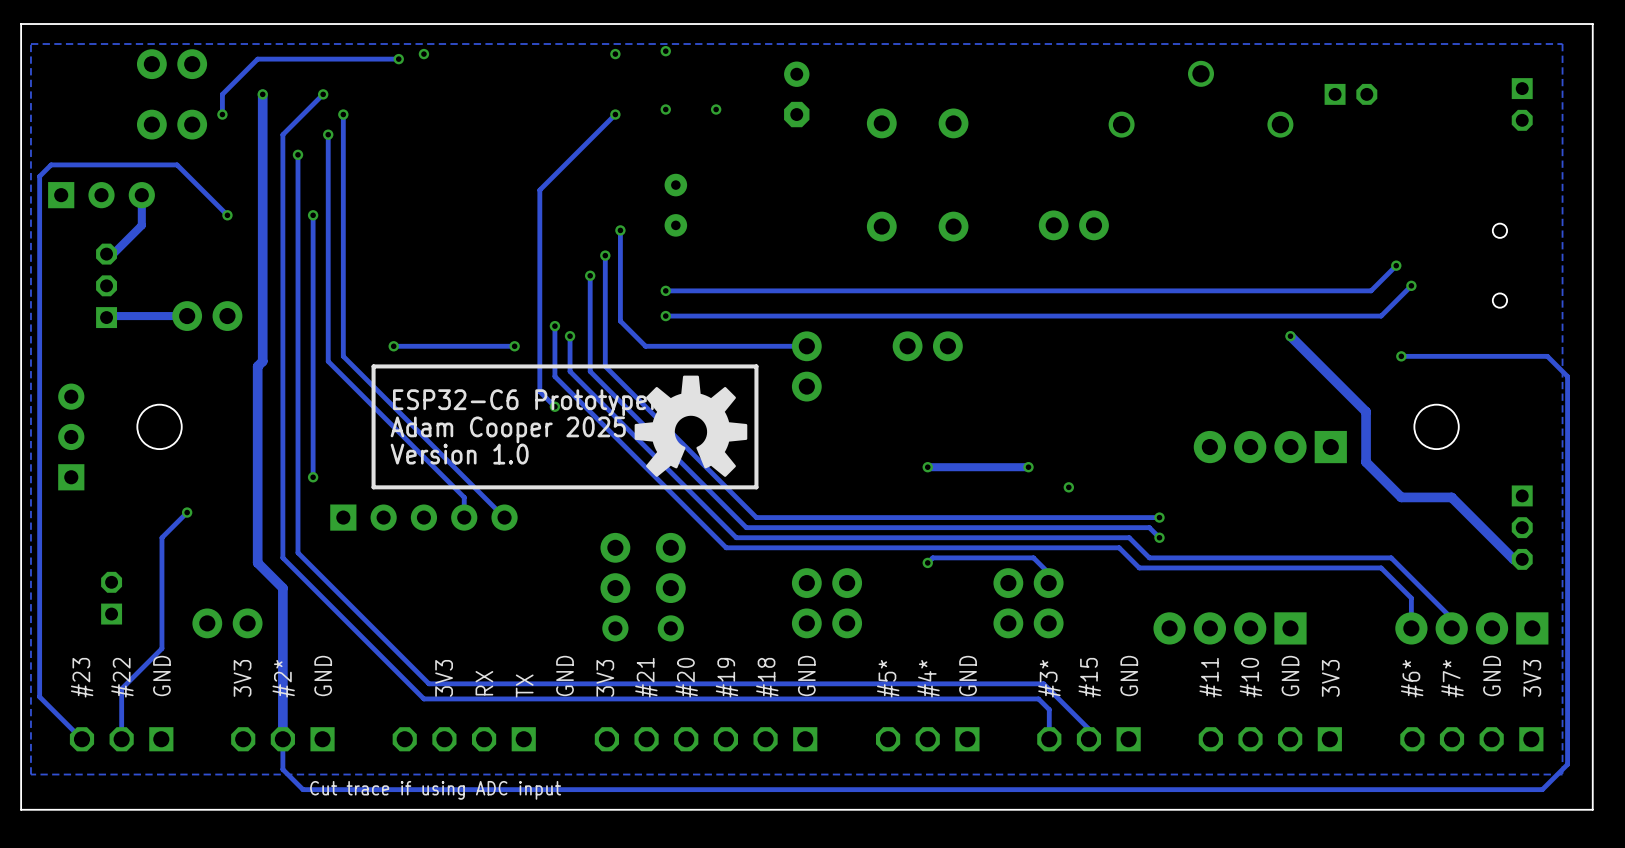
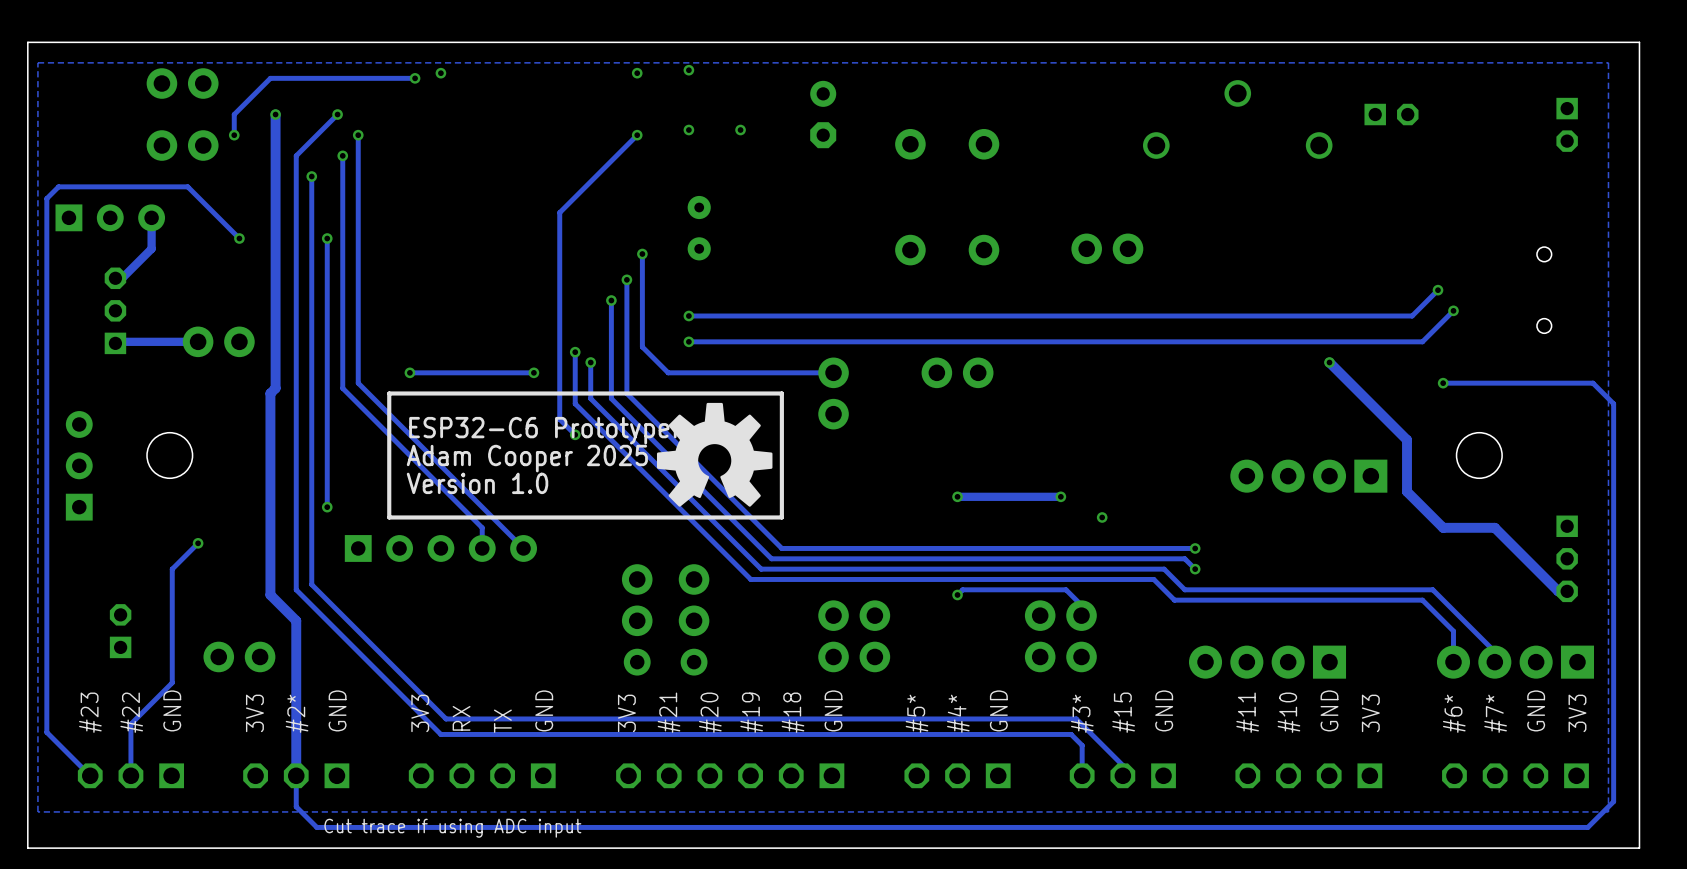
text: GND (565, 675) -> none
text: none -> 3V3 (420, 713)
text: 3V3 (444, 678) -> RX (461, 718)
text: RX (484, 683) -> TX (502, 721)
text: TX (524, 686) -> GND (544, 710)

